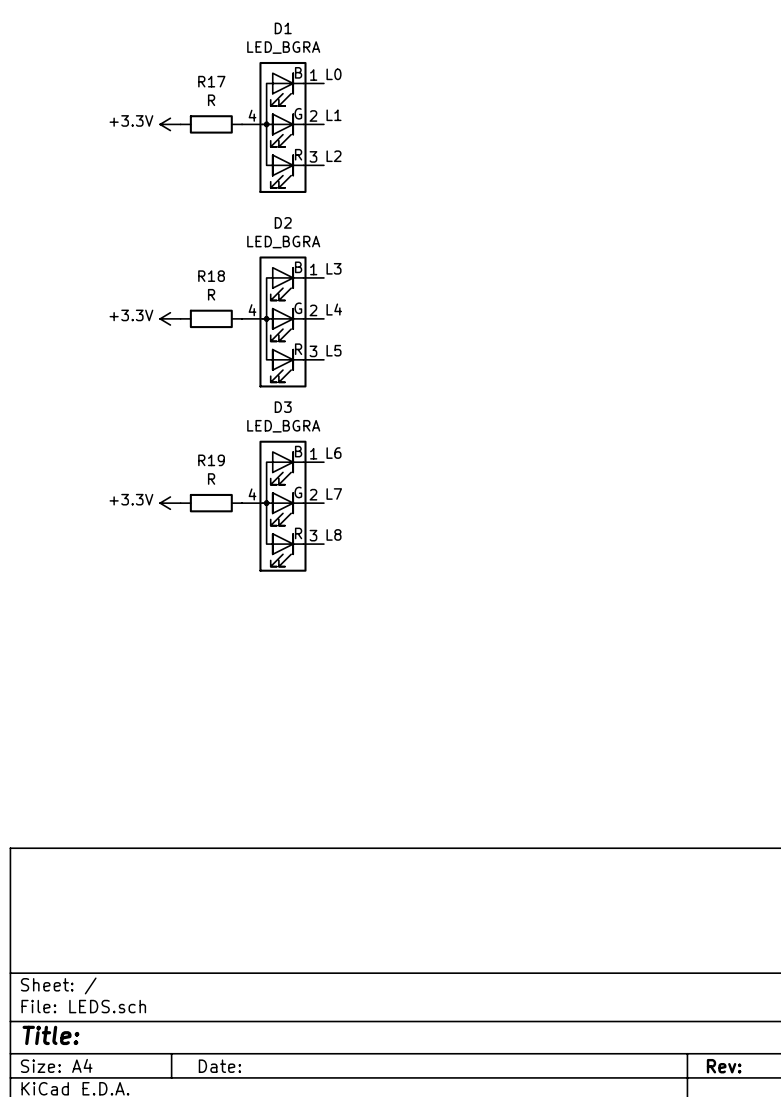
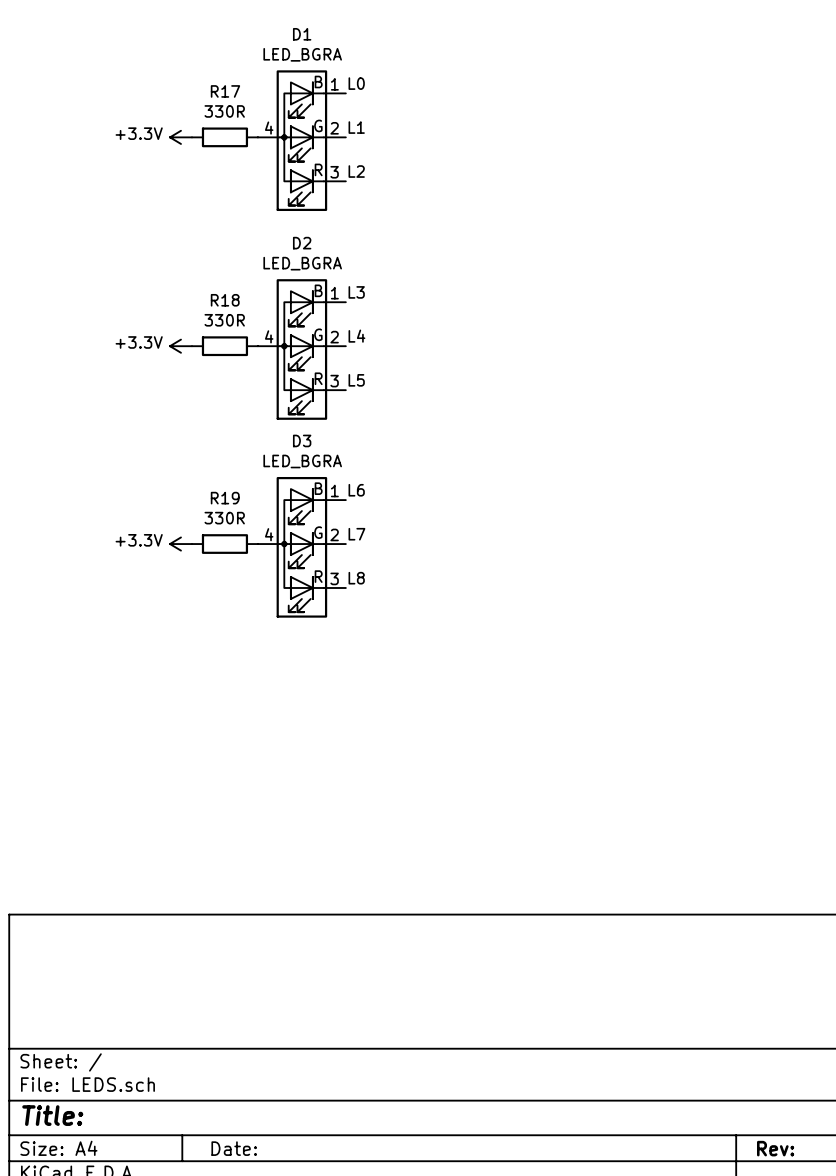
R17 value: R (211, 100) -> 330R (224, 111)
R18 value: R (211, 294) -> 330R (224, 320)
R19 value: R (211, 479) -> 330R (224, 518)

